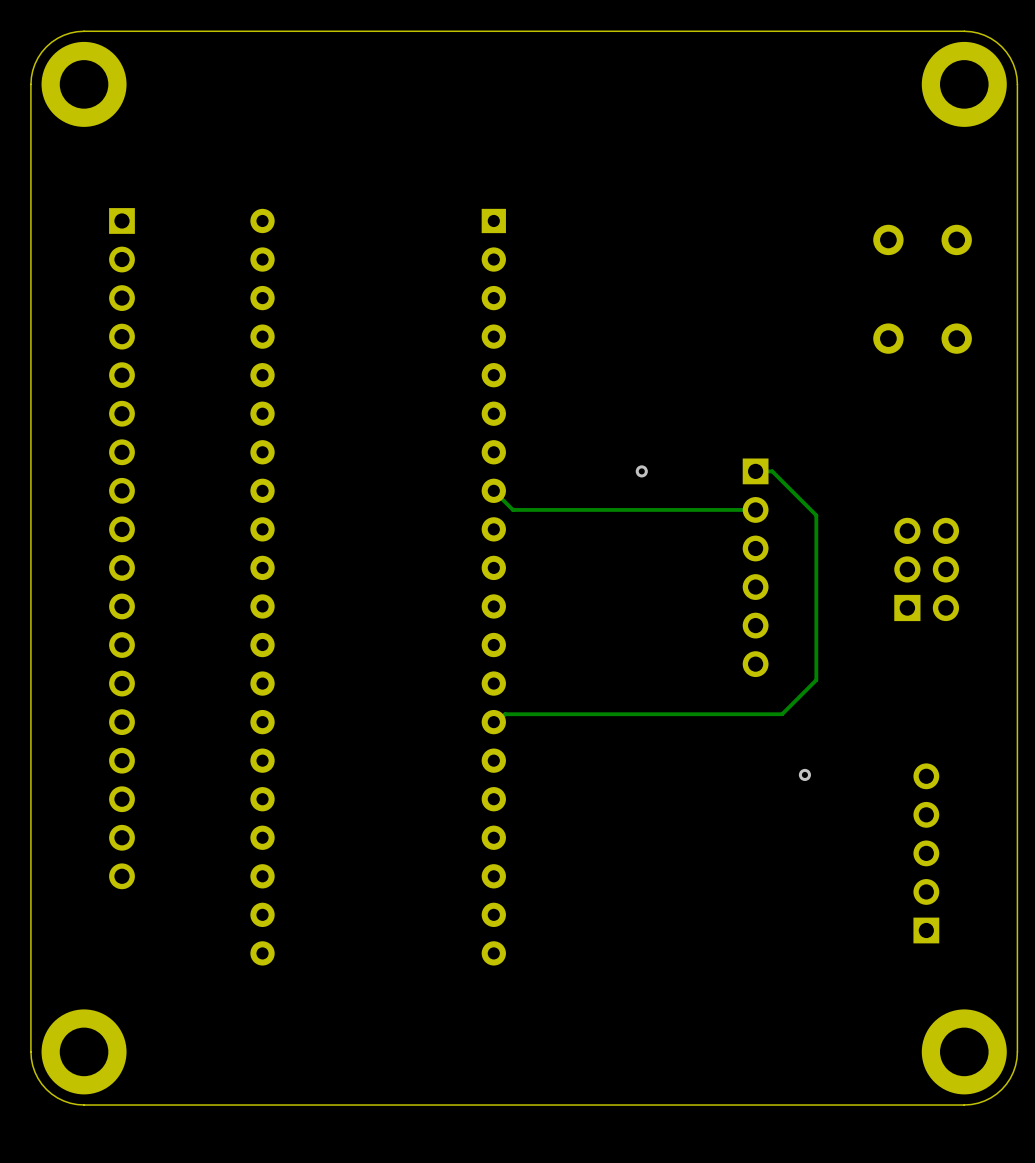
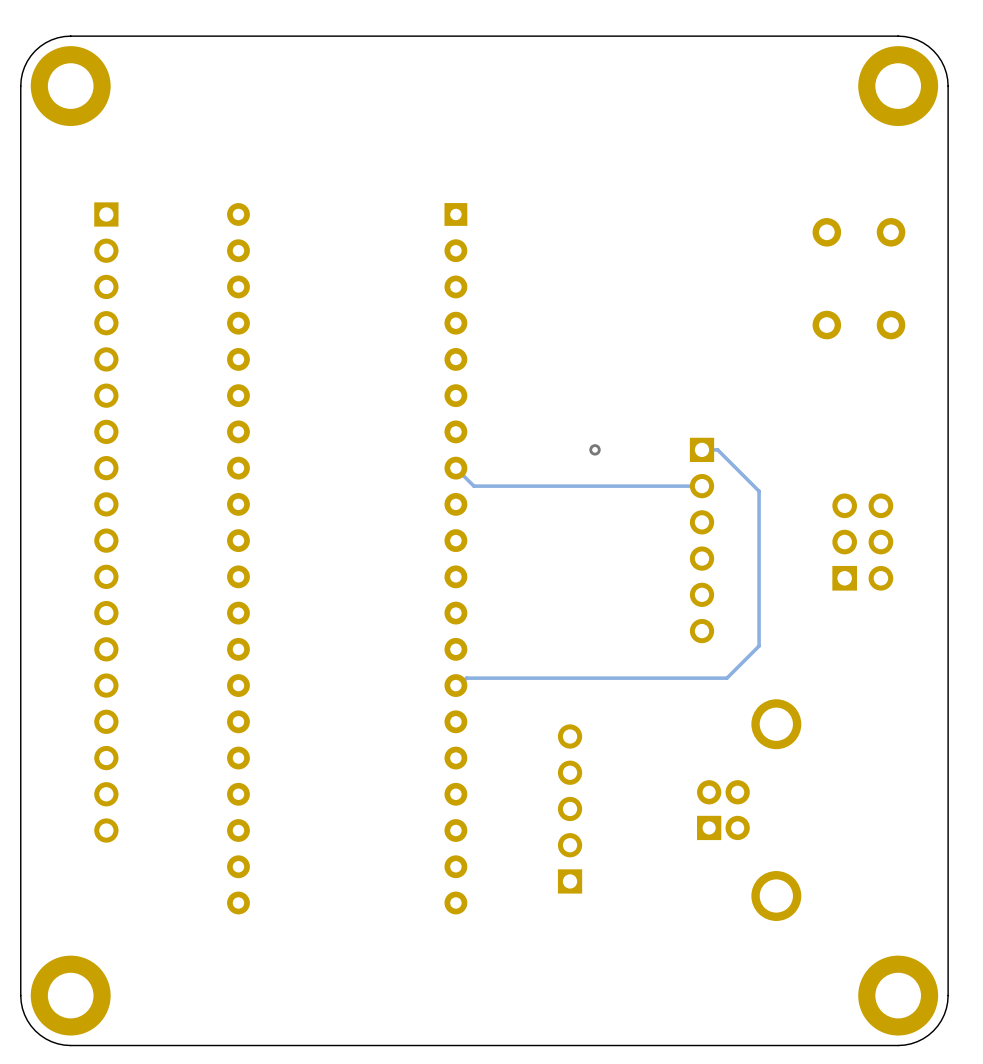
via: (804, 774) -> none
part position: (926, 853) -> (570, 808)
part: none -> (749, 810)

